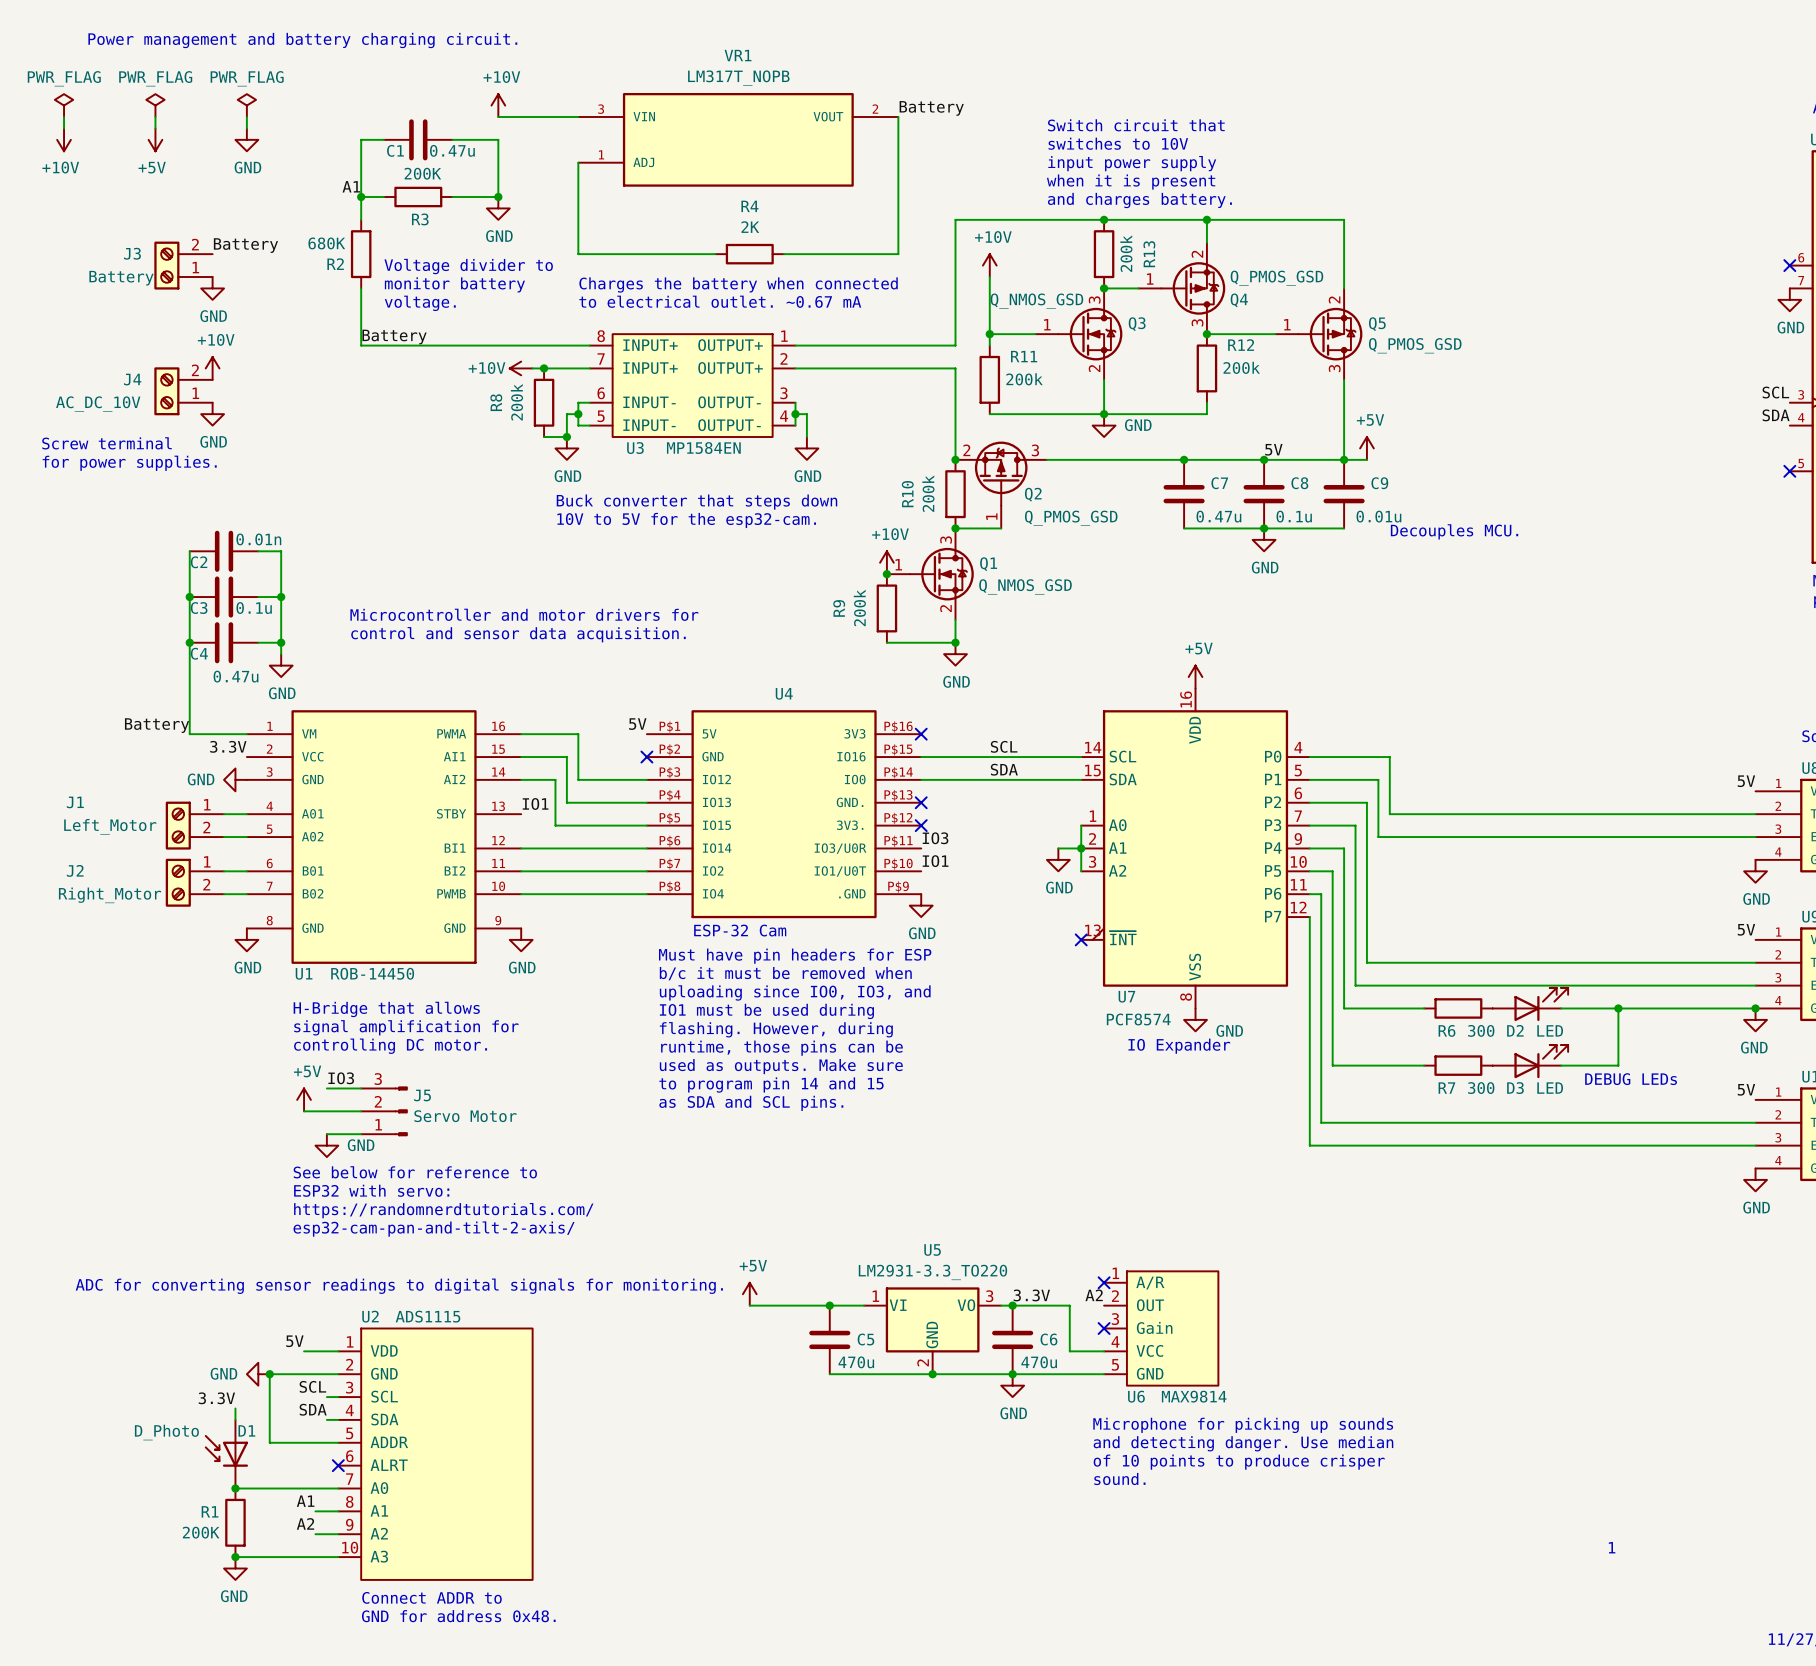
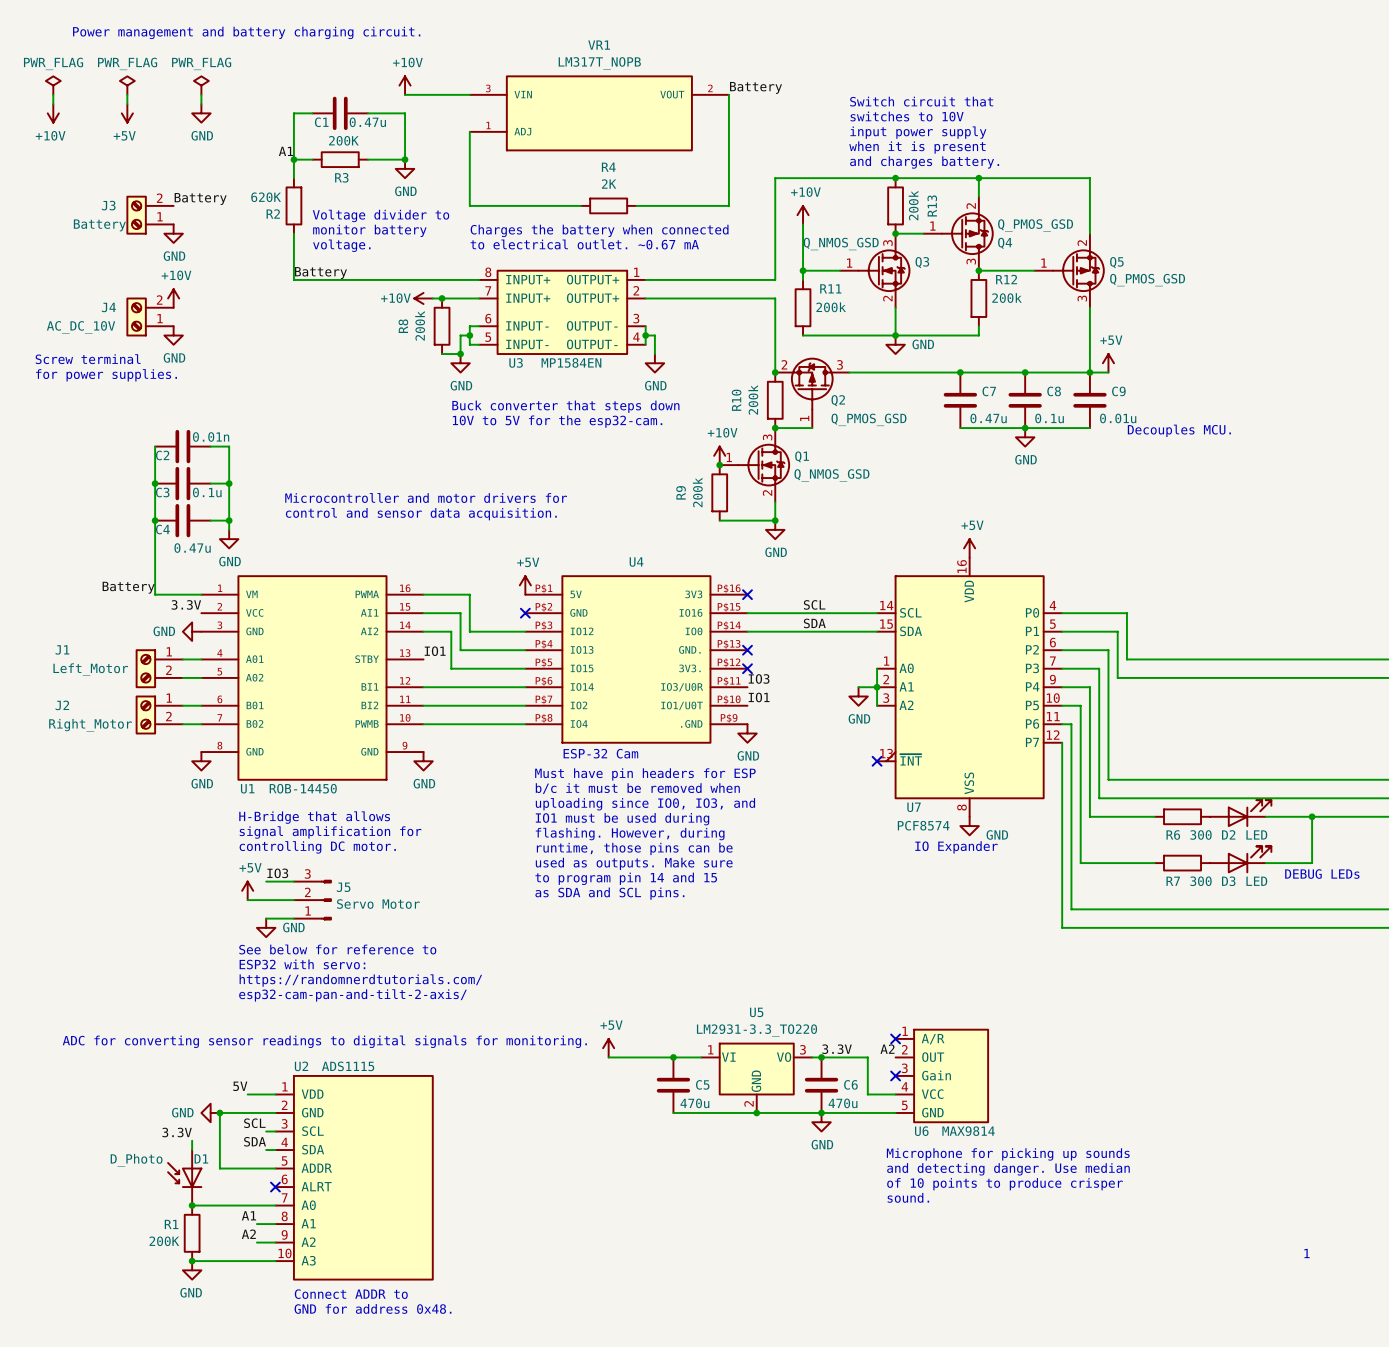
R2 value: 680K (326, 243) -> 620K (266, 197)
label: 5V (1273, 449) -> none
power symbol: none -> +5V (525, 585)
label: 5V (637, 724) -> none

